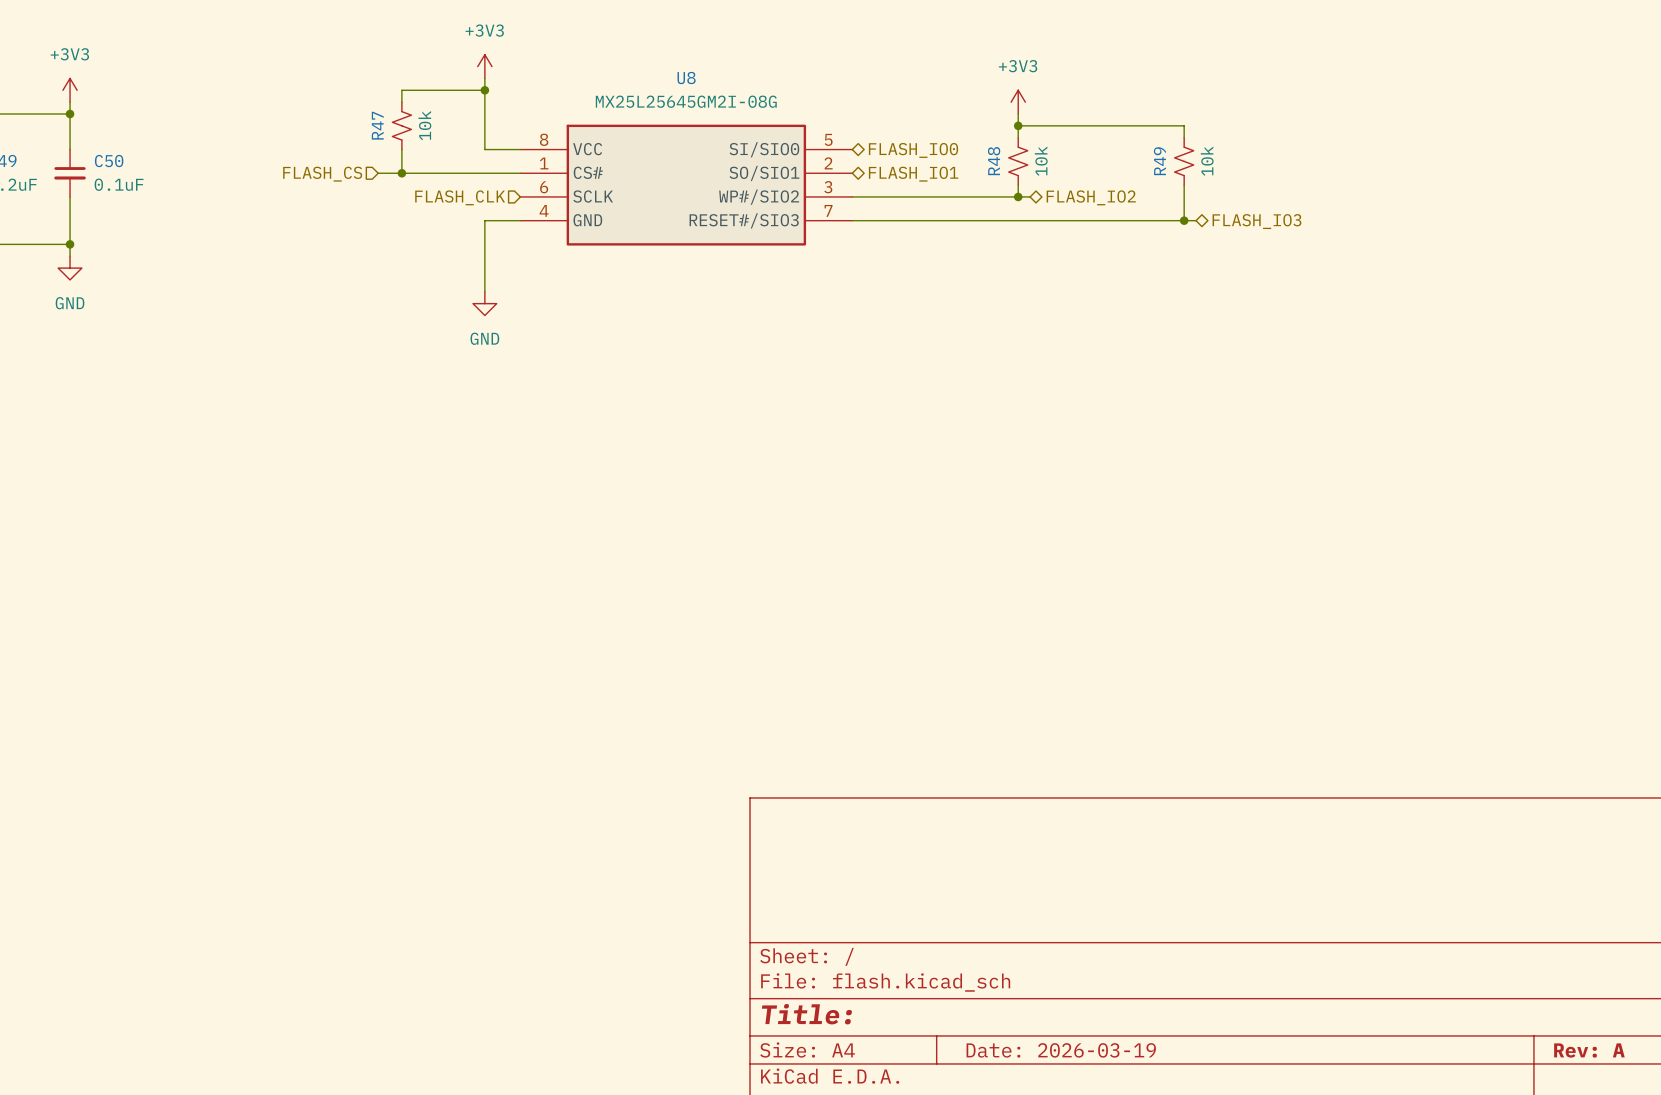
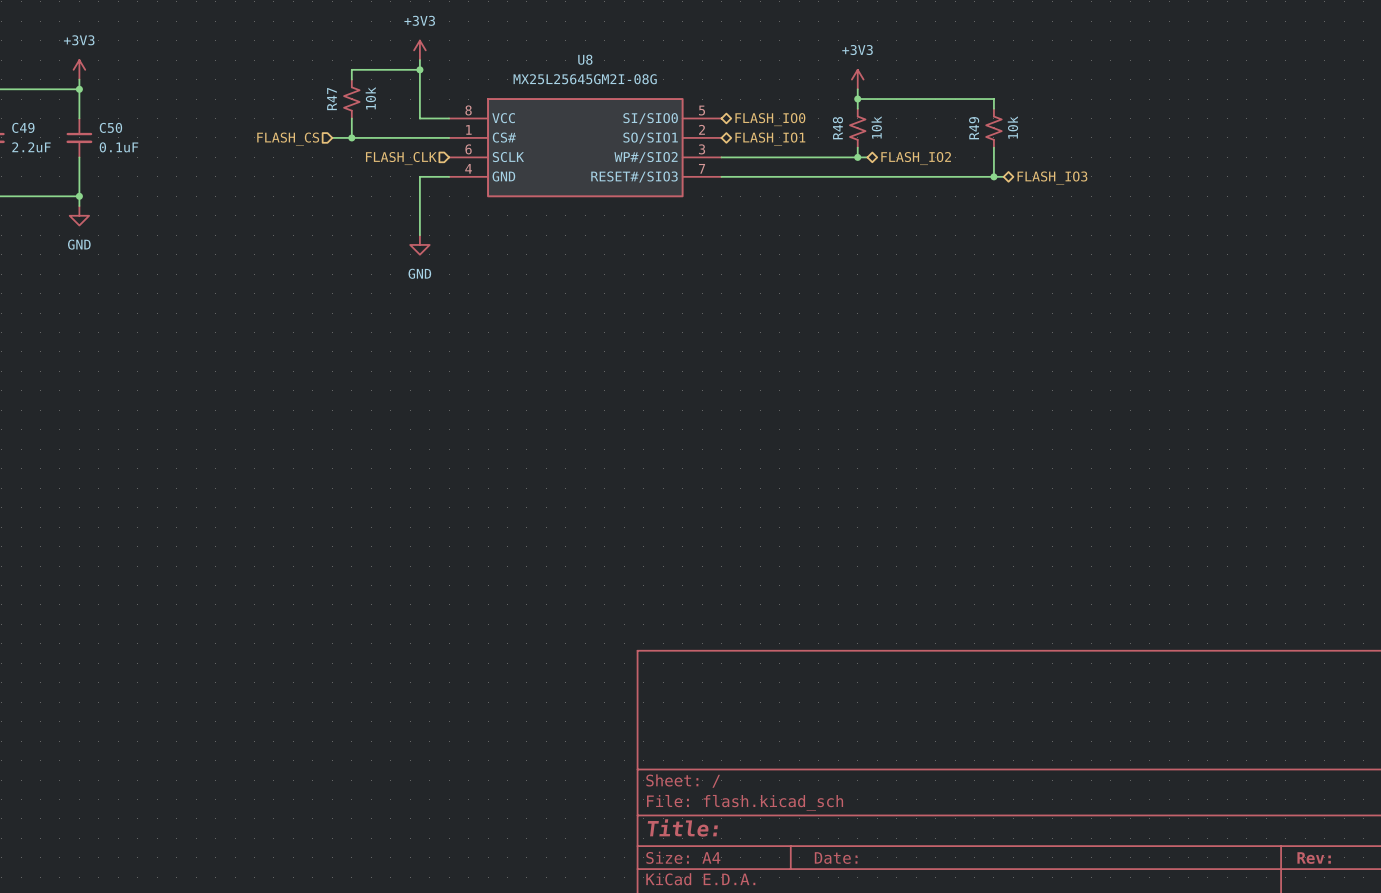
title block: Date: 2026-03-19 (1061, 1050) -> Date: (836, 858)
title block: Rev: A (1589, 1050) -> Rev: (1314, 858)

